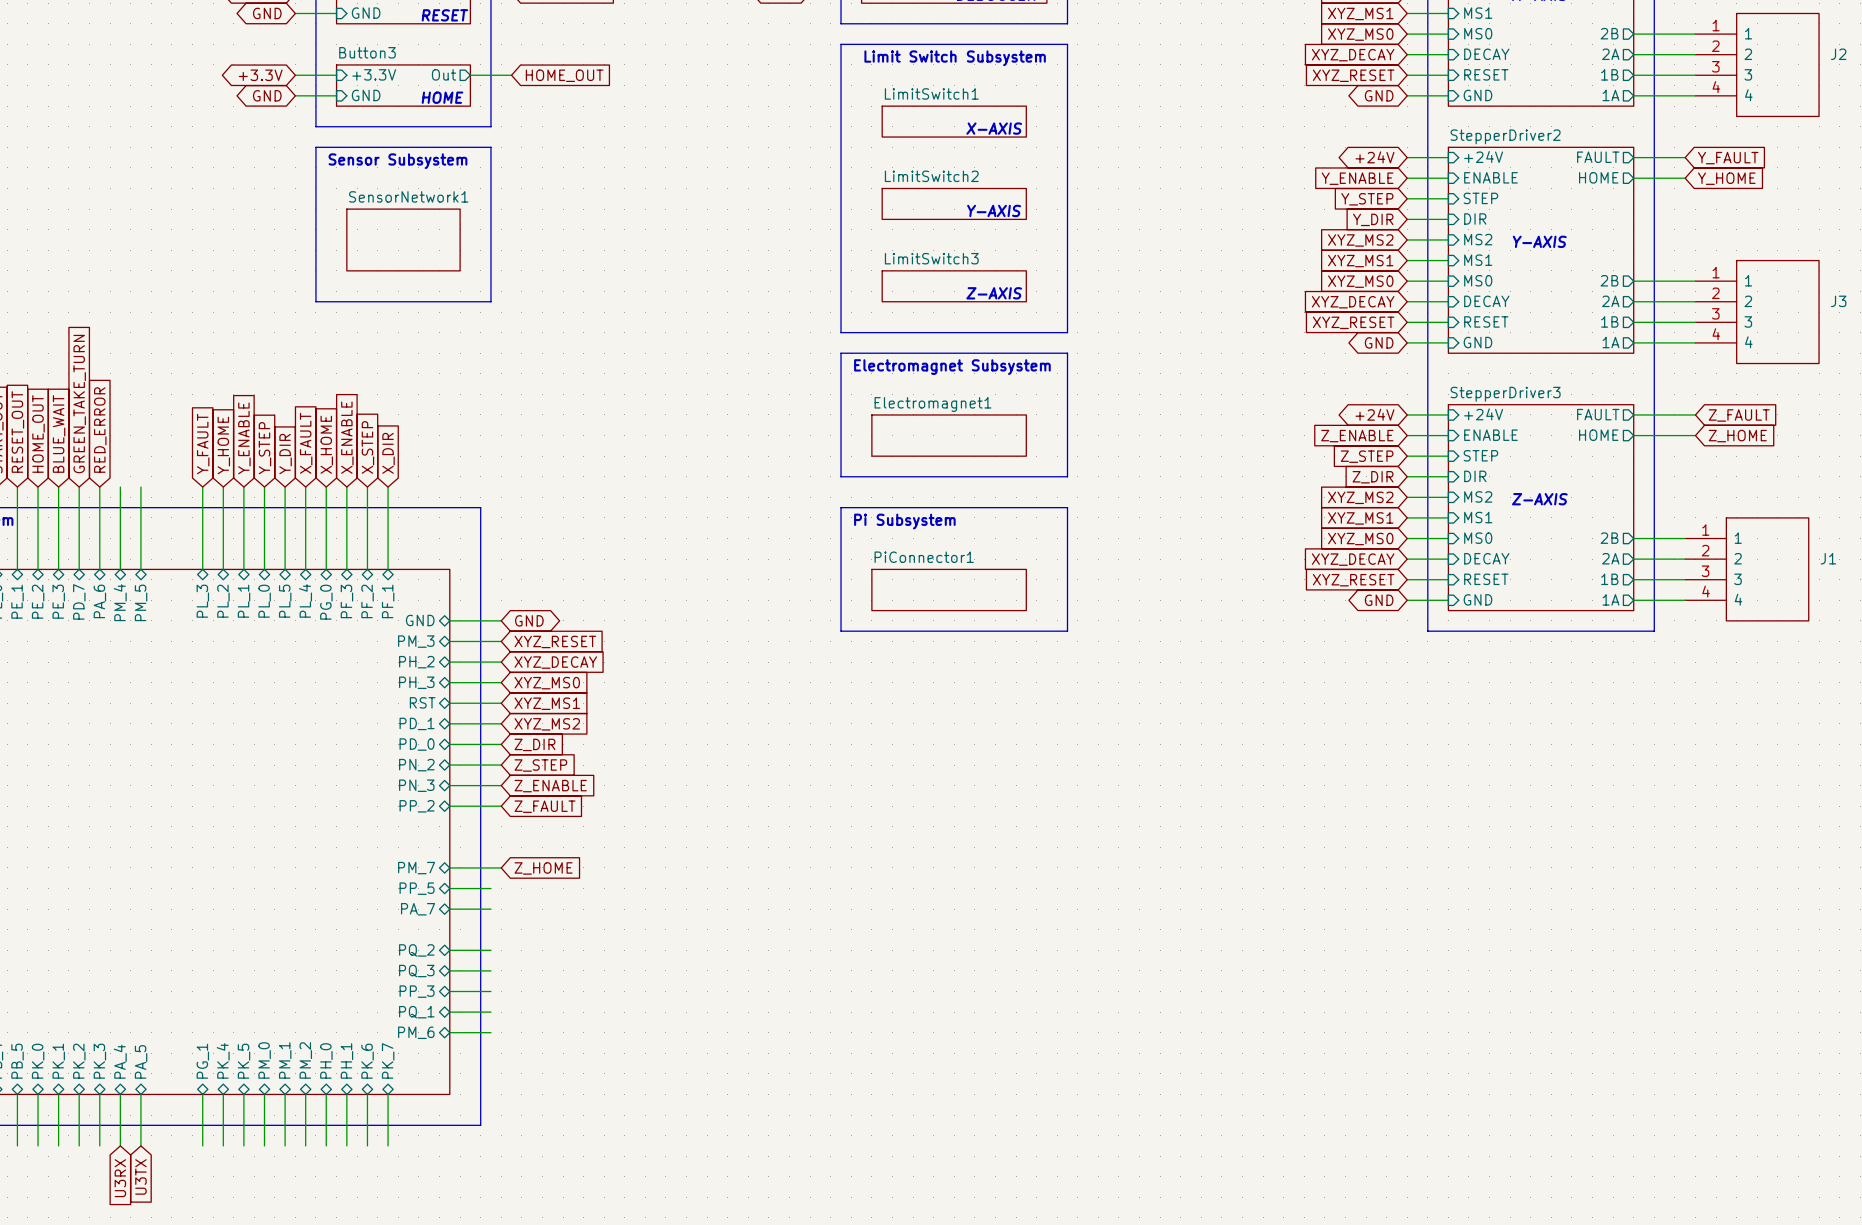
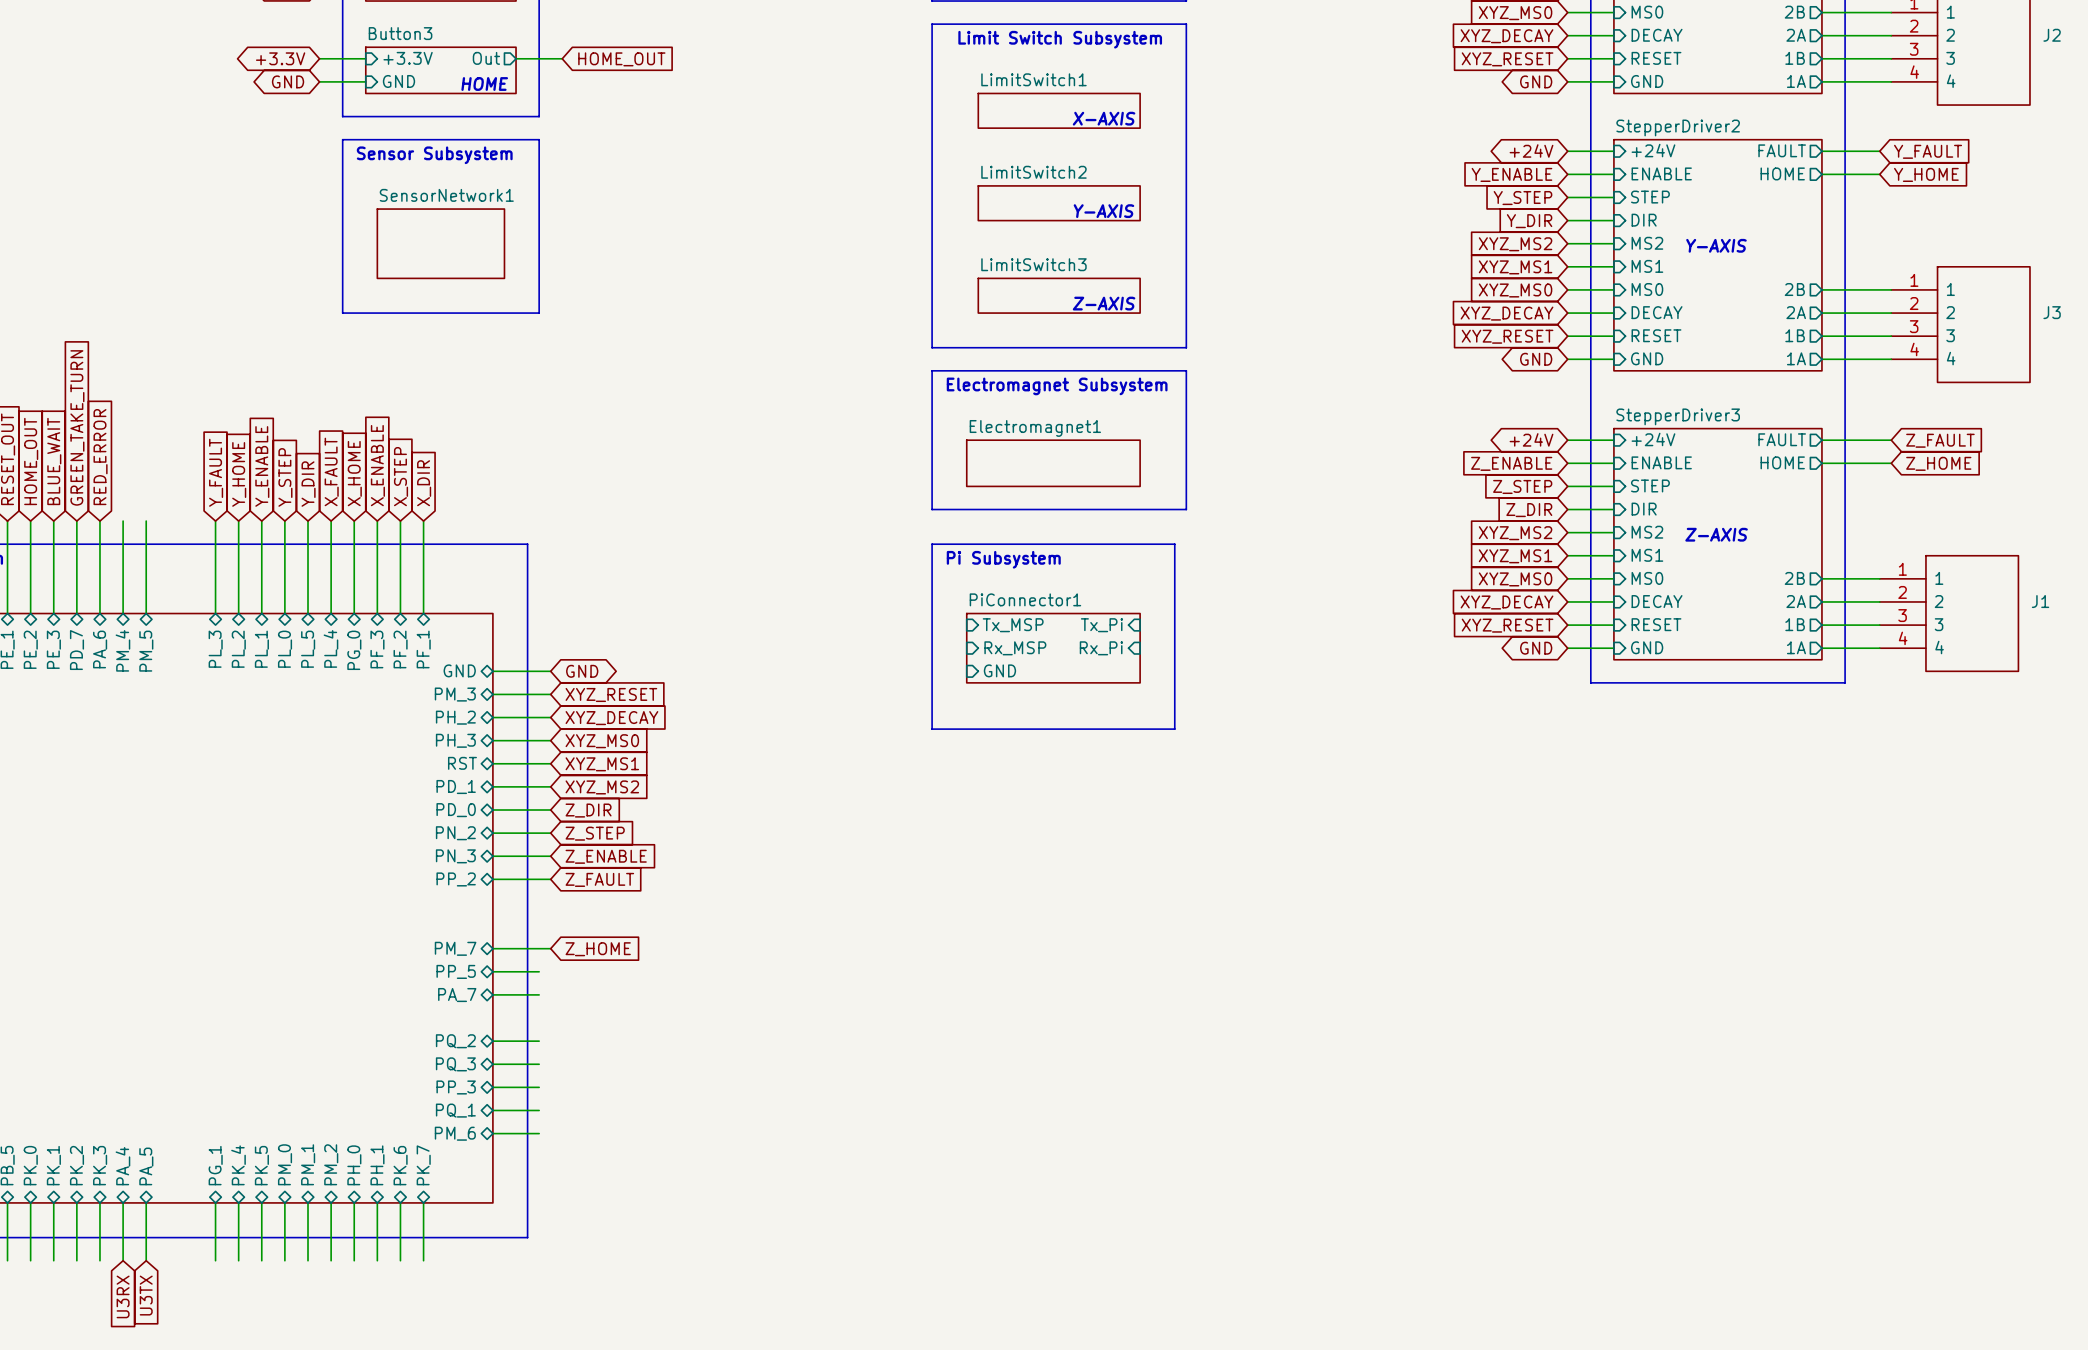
line: (1057, 507) (1067, 507) (1067, 631) (841, 631) -> (1174, 544) (1174, 729) (932, 729) (932, 682)
sheet PiConnector1 shape: [871, 568, 1027, 612] -> [966, 612, 1141, 684]
sheet pin: none -> Tx_MSP (1013, 625)
sheet pin: none -> Tx_Pi (1101, 625)
sheet pin: none -> Rx_MSP (1015, 648)
sheet pin: none -> Rx_Pi (1101, 648)
sheet pin: none -> GND (999, 670)

